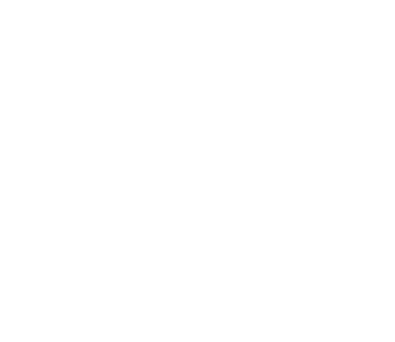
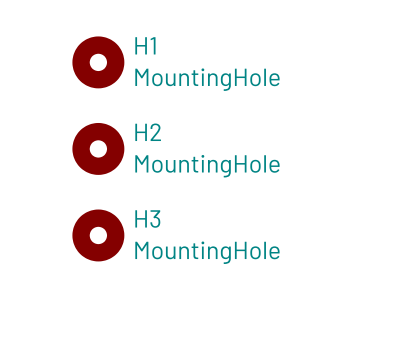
H1: none -> MountingHole (98, 62)
H2: none -> MountingHole (98, 148)
H3: none -> MountingHole (98, 235)

